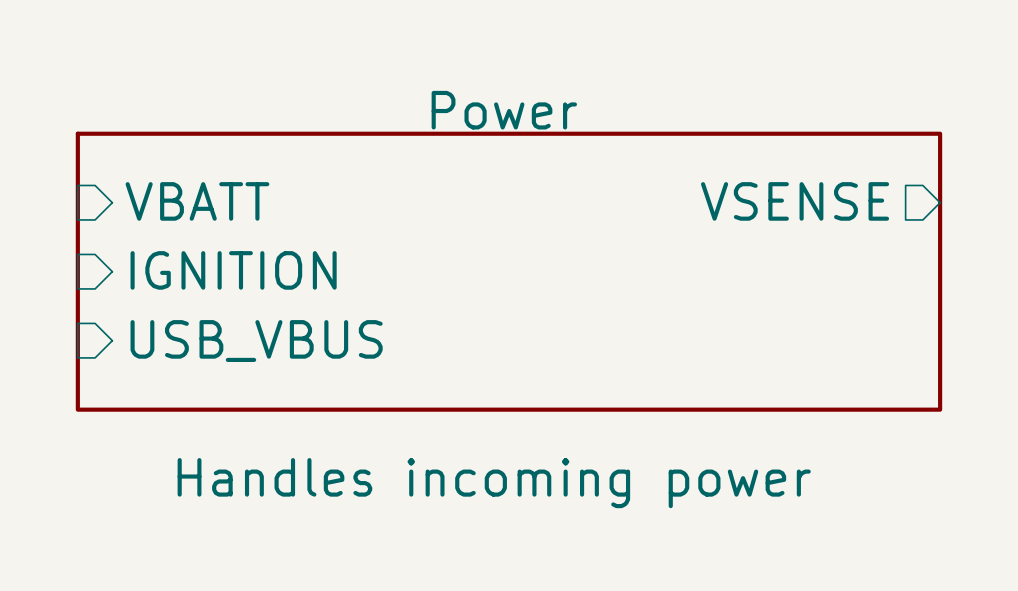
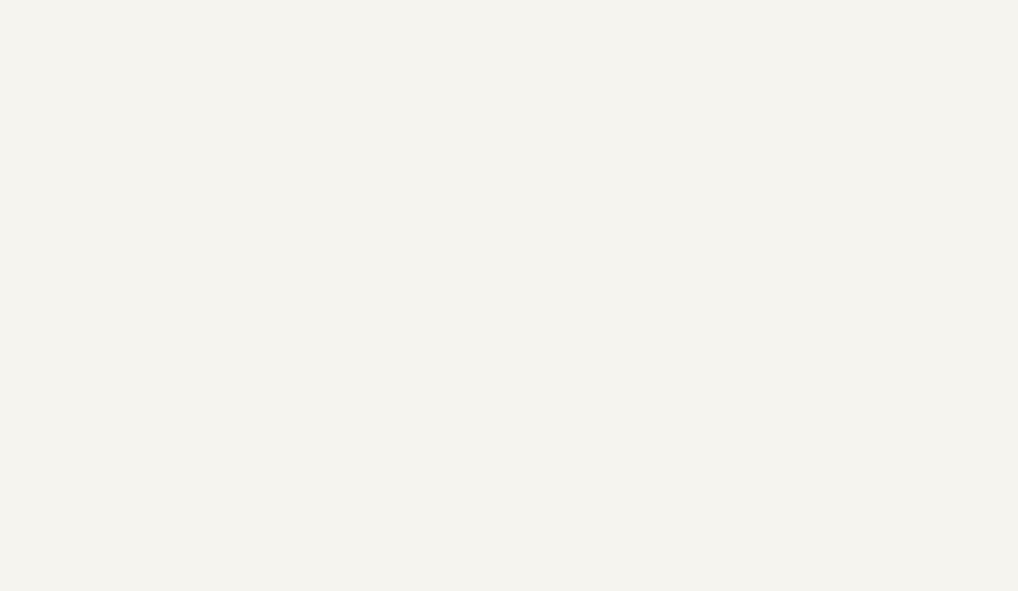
sheet pin: VBATT (197, 201) -> none
sheet pin: VSENSE (795, 201) -> none
sheet pin: IGNITION (233, 270) -> none
sheet Power: (508, 271) -> none
sheet pin: USB_VBUS (256, 341) -> none

